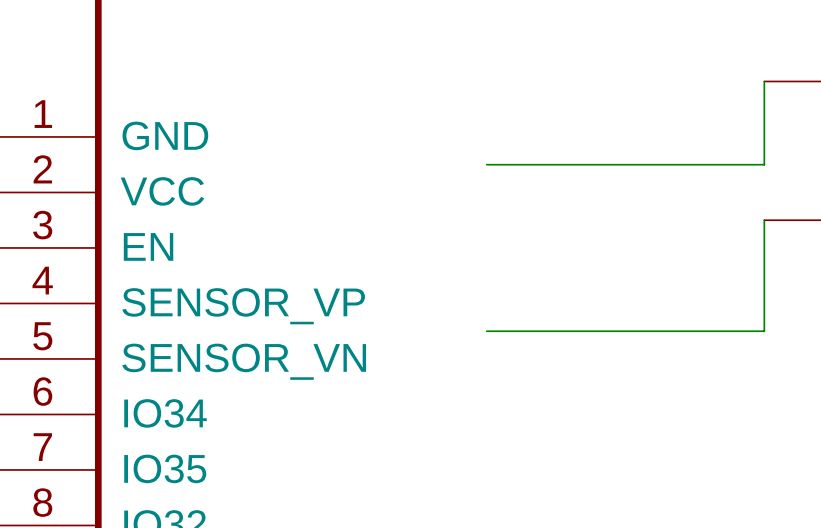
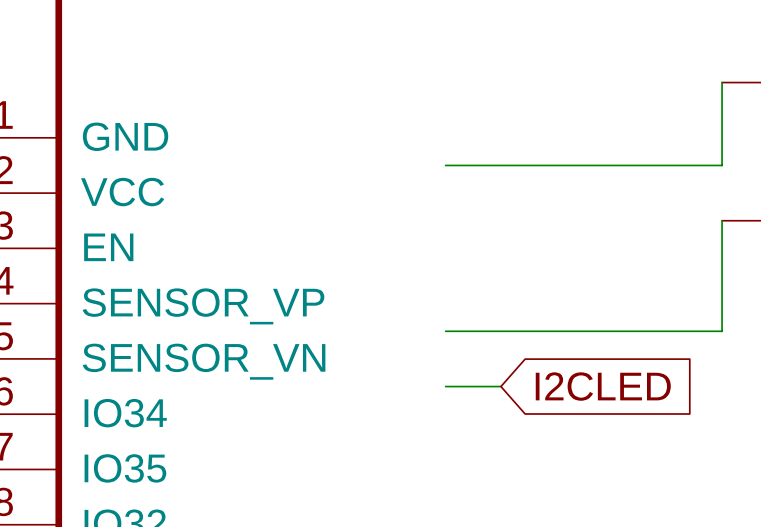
wire: none -> (445, 386) (500, 386)
global label: none -> I2CLED (603, 386)

